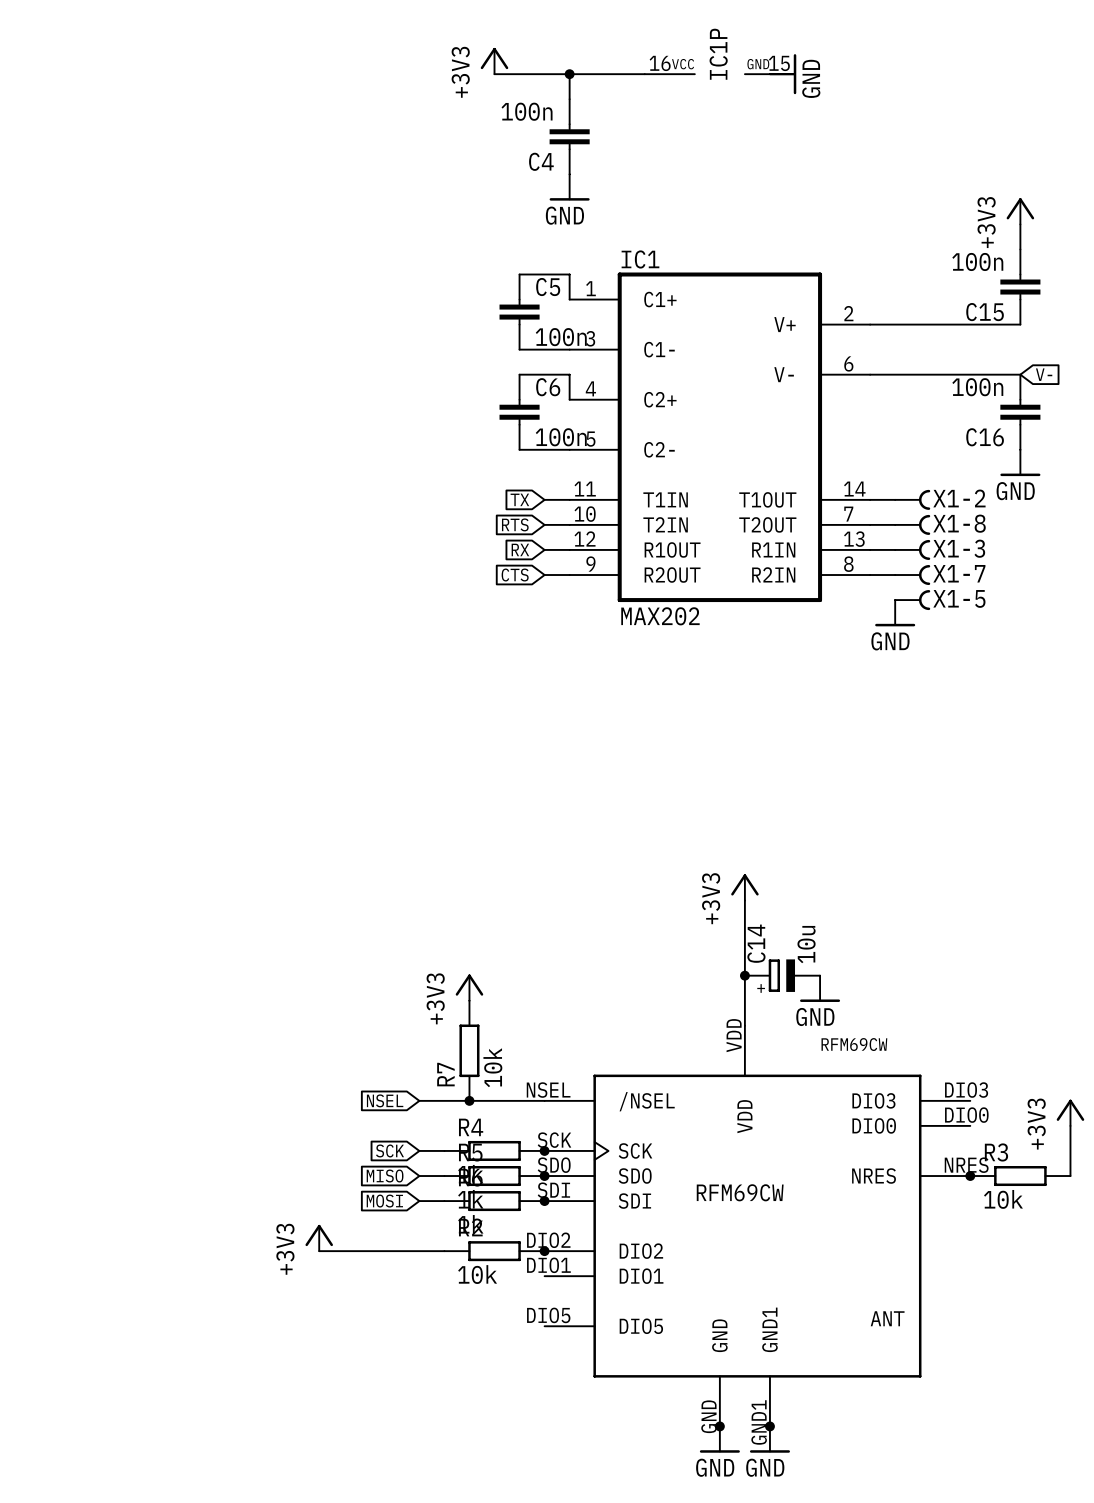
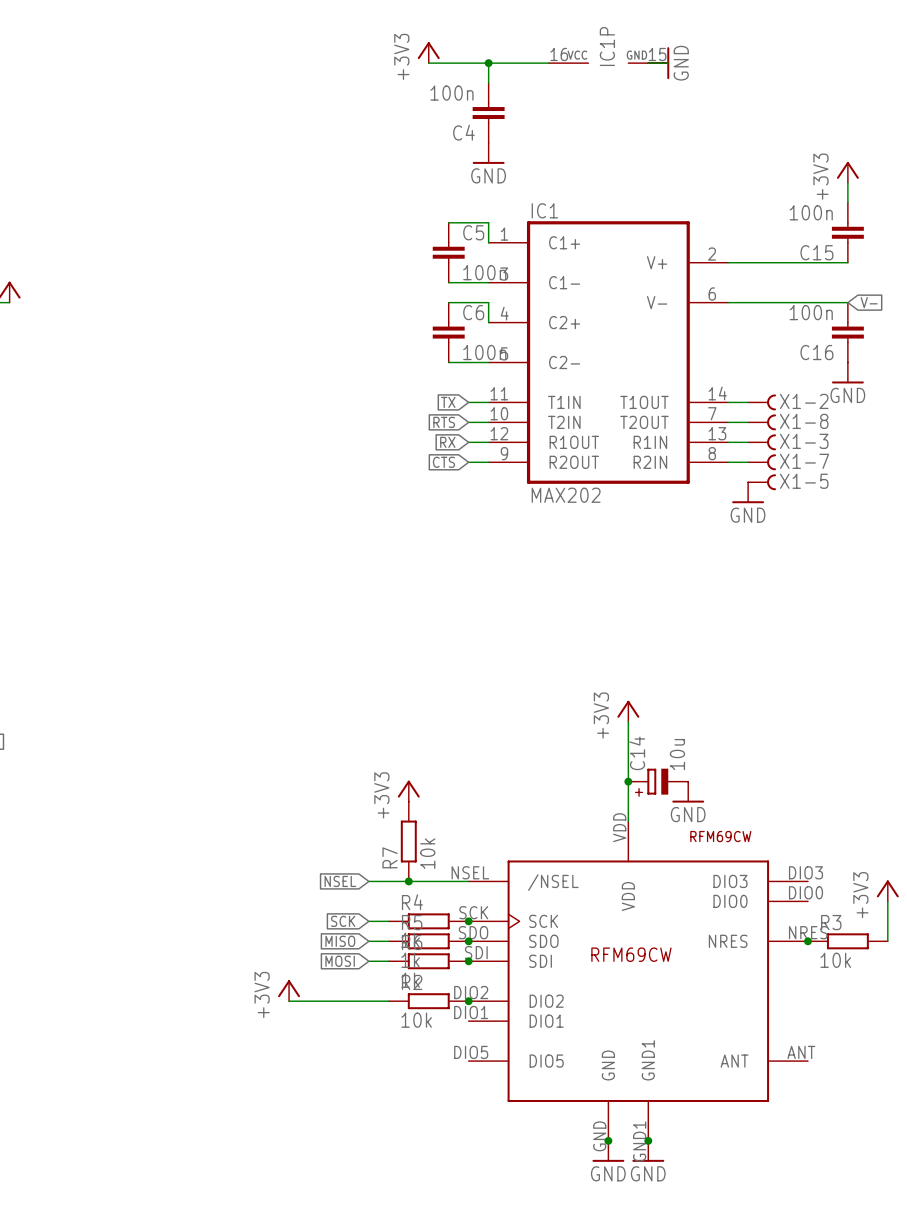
part symbol: [544, 1025, 971, 1427] -> [468, 821, 808, 1141]

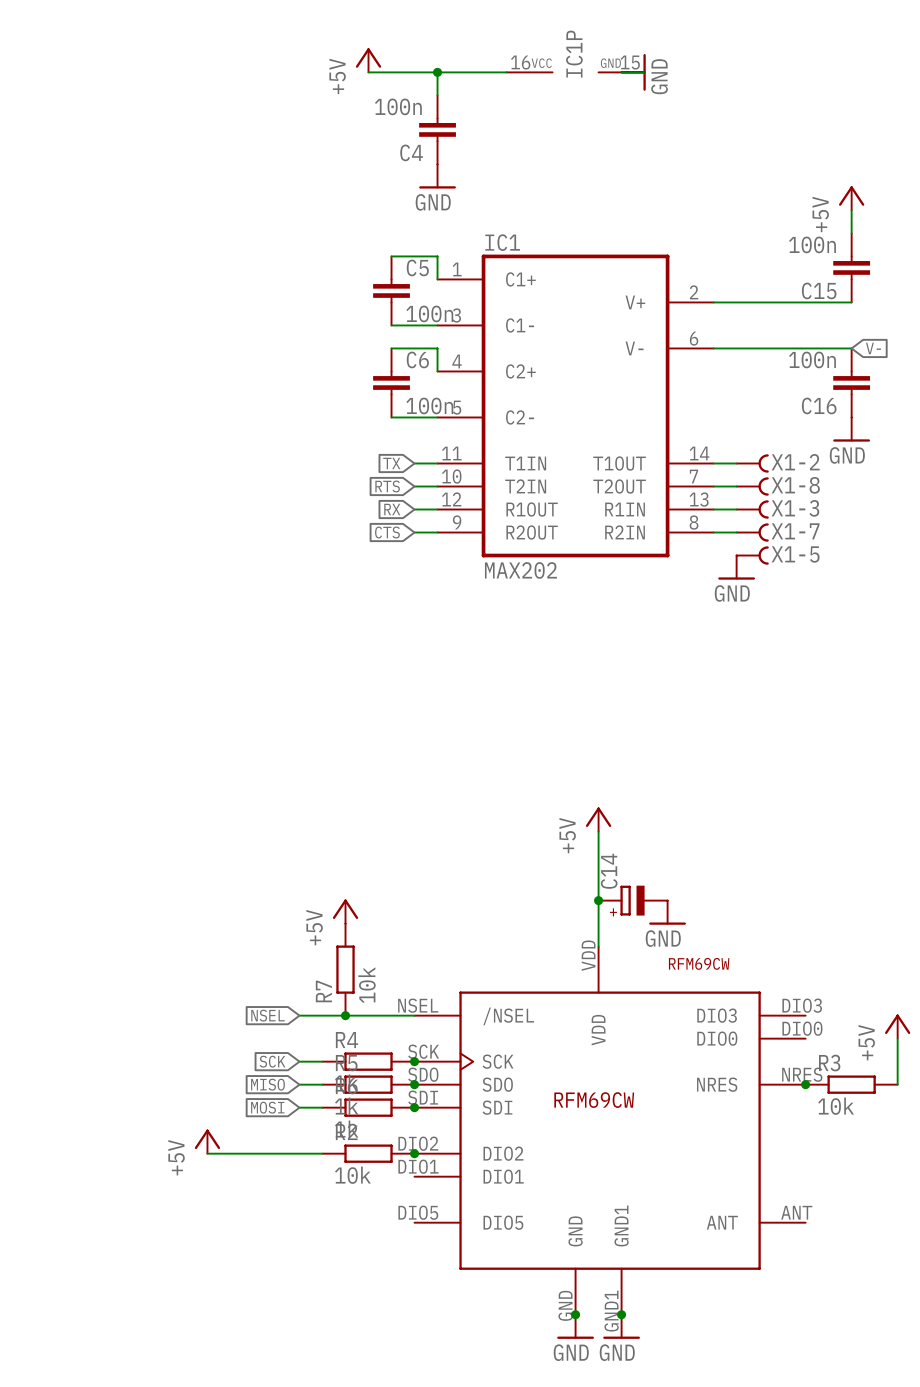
power symbol: +3V3 (428, 52) -> +5V (368, 60)
power symbol: +3V3 (847, 172) -> +5V (851, 198)
power symbol: +3V3 (628, 711) -> +5V (598, 819)
C14 value: 10u (677, 754) -> none
power symbol: +3V3 (408, 791) -> +5V (345, 911)
power symbol: +3V3 (887, 890) -> +5V (897, 1026)
power symbol: +3V3 (289, 990) -> +5V (207, 1141)

